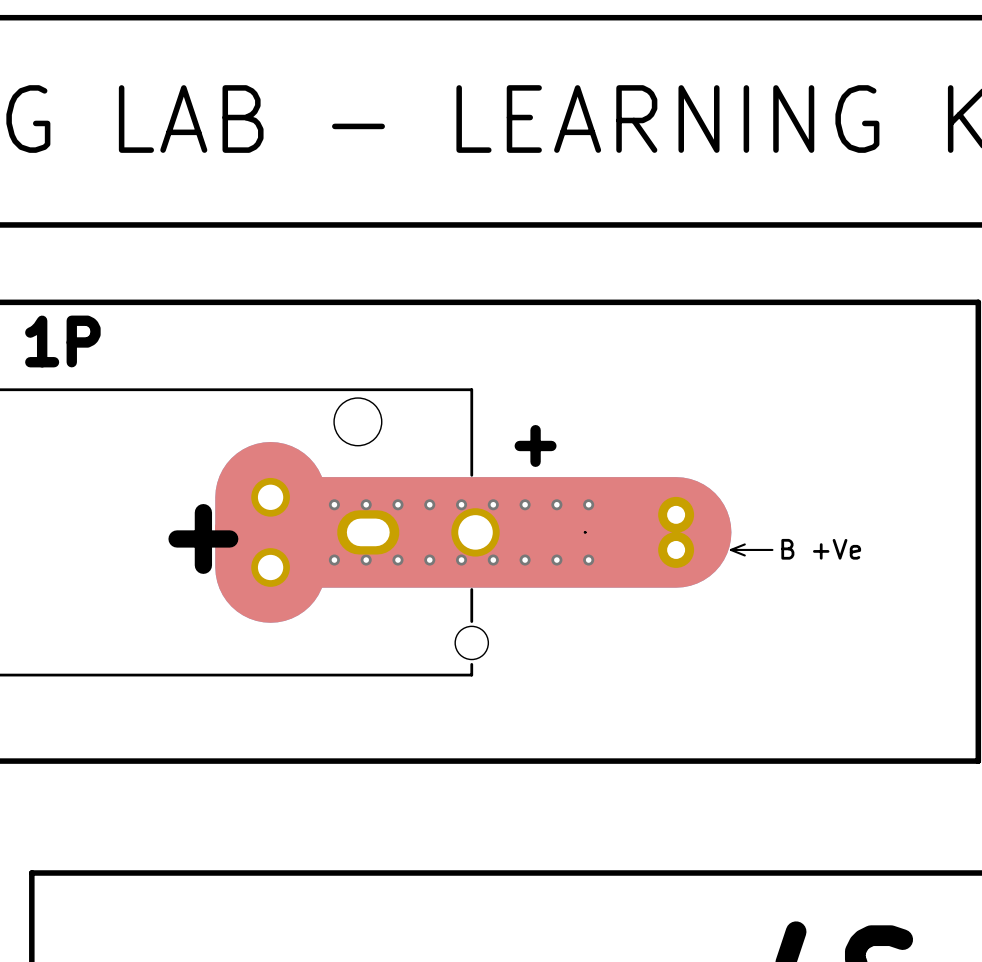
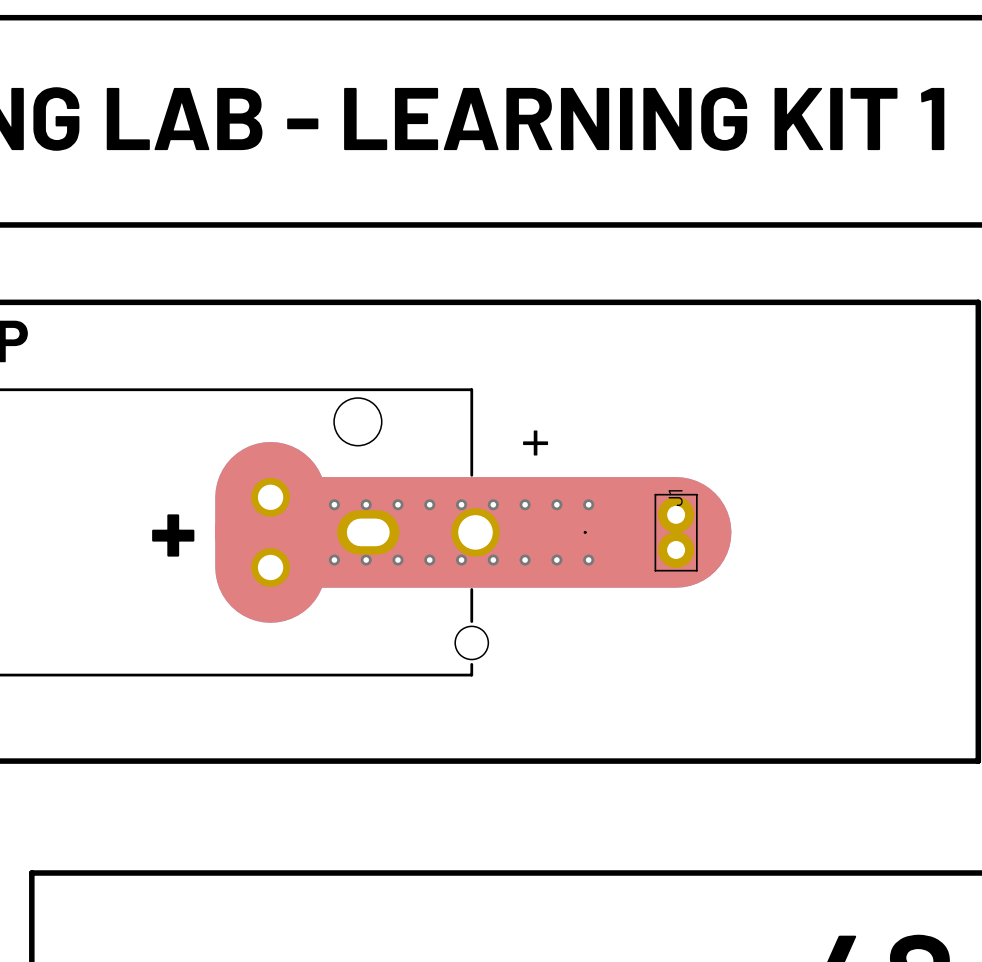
part: (676, 532) -> none
J1: none -> (676, 532)
line: (744, 544) (730, 549) -> none
line: (730, 549) (772, 549) -> none
line: (730, 549) (744, 555) -> none
text: B +Ve (821, 549) -> none

